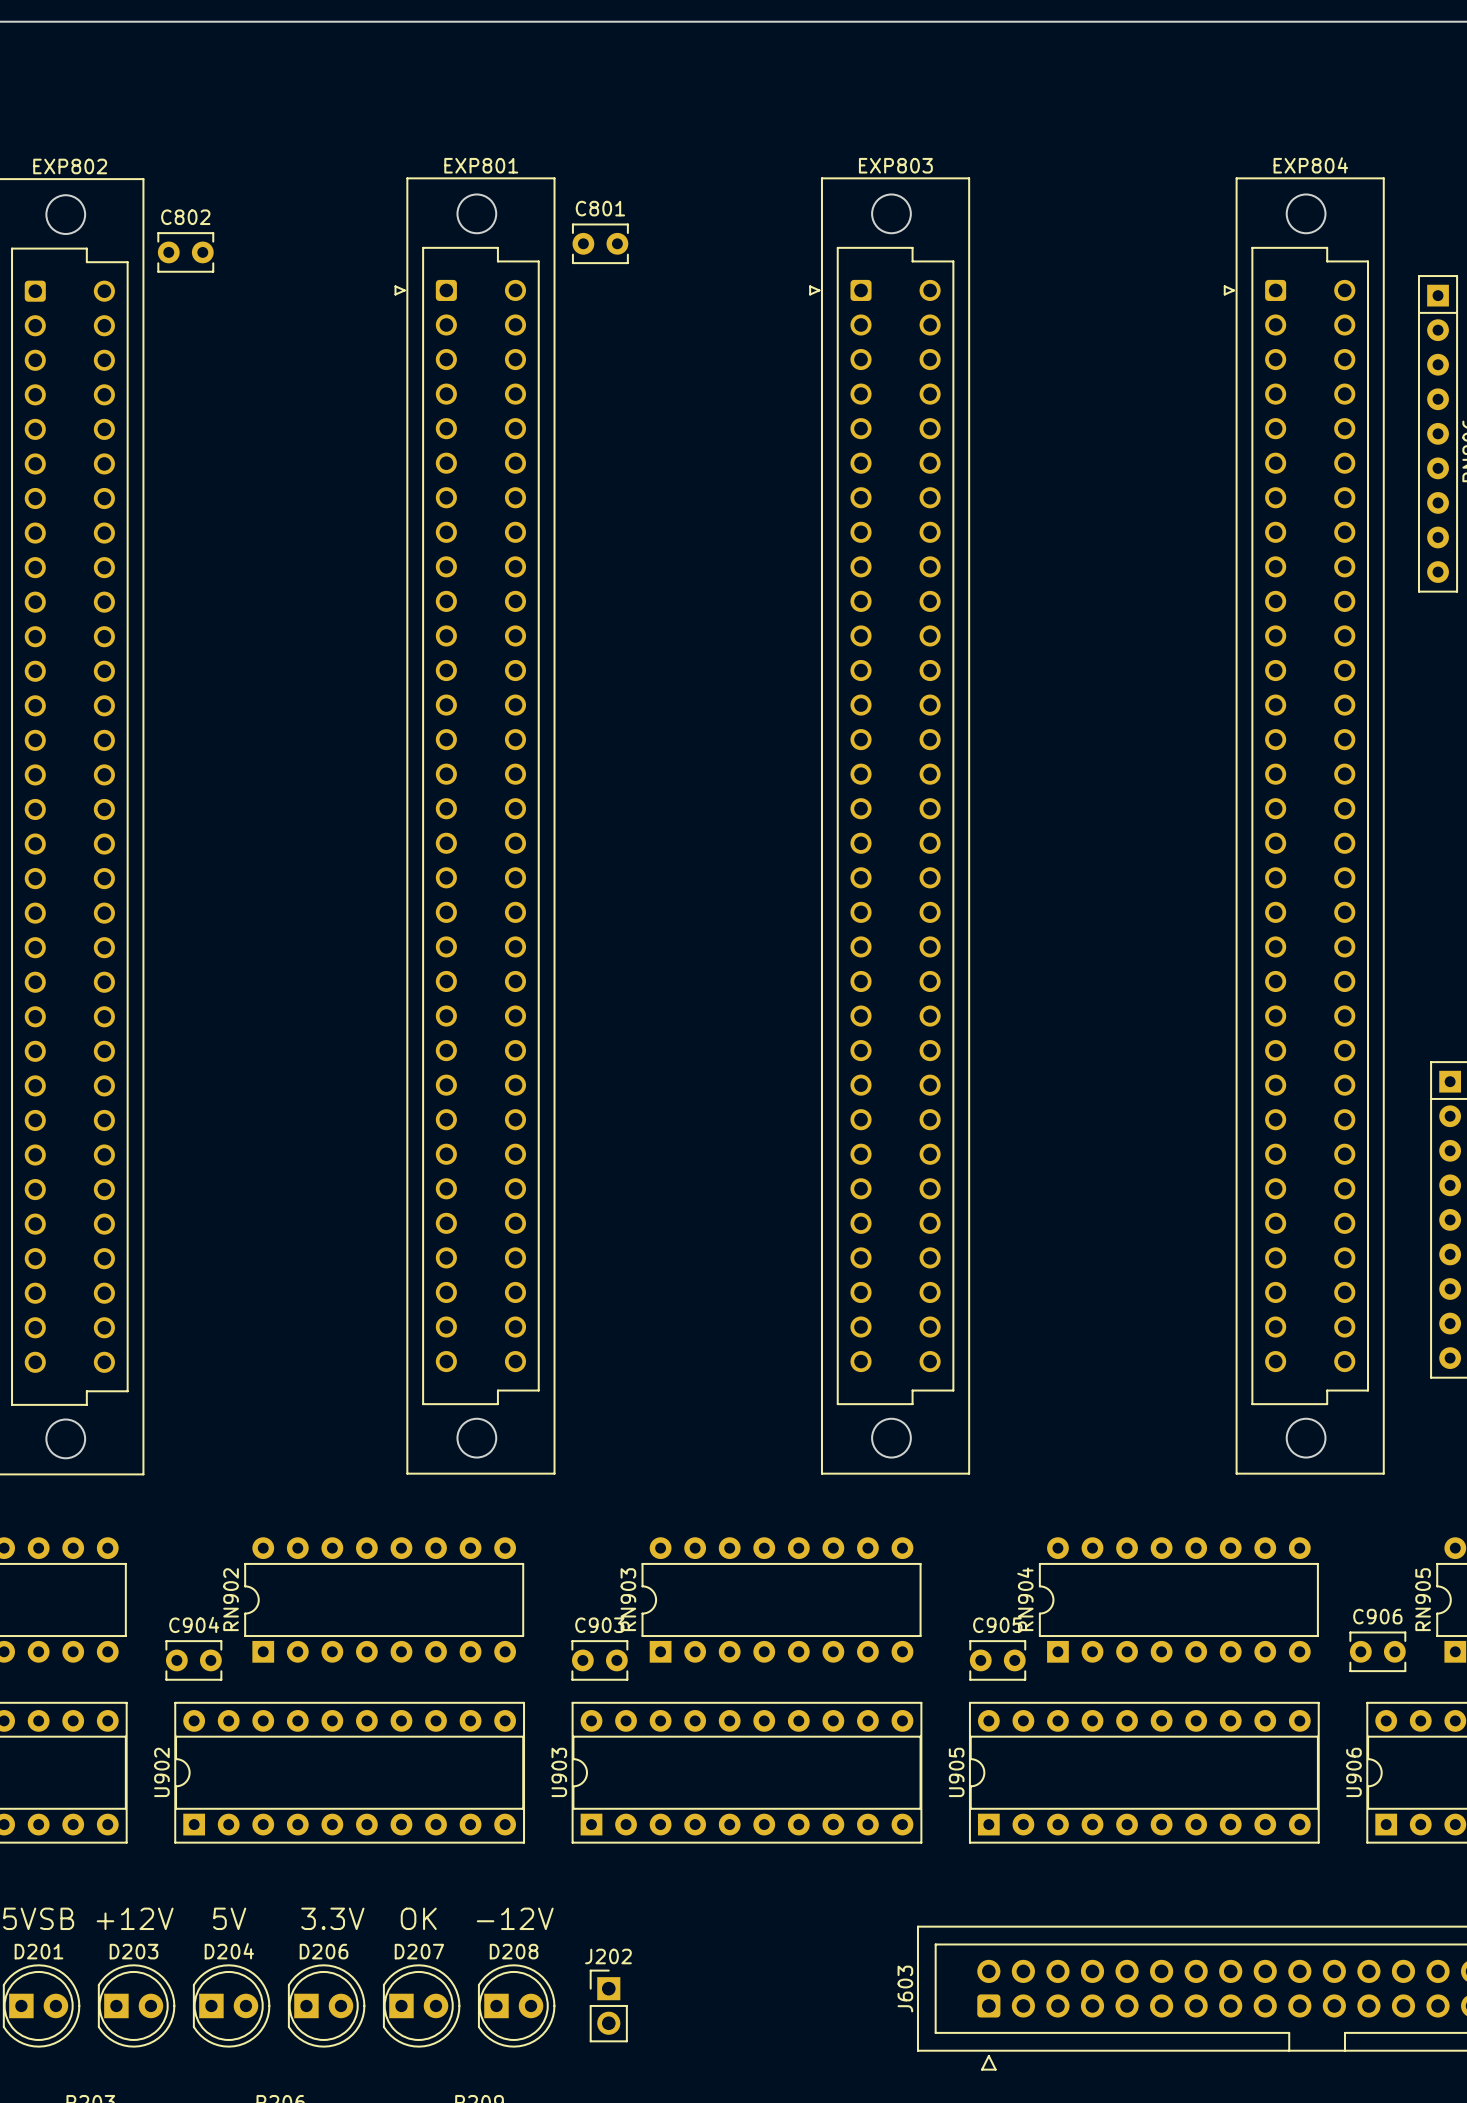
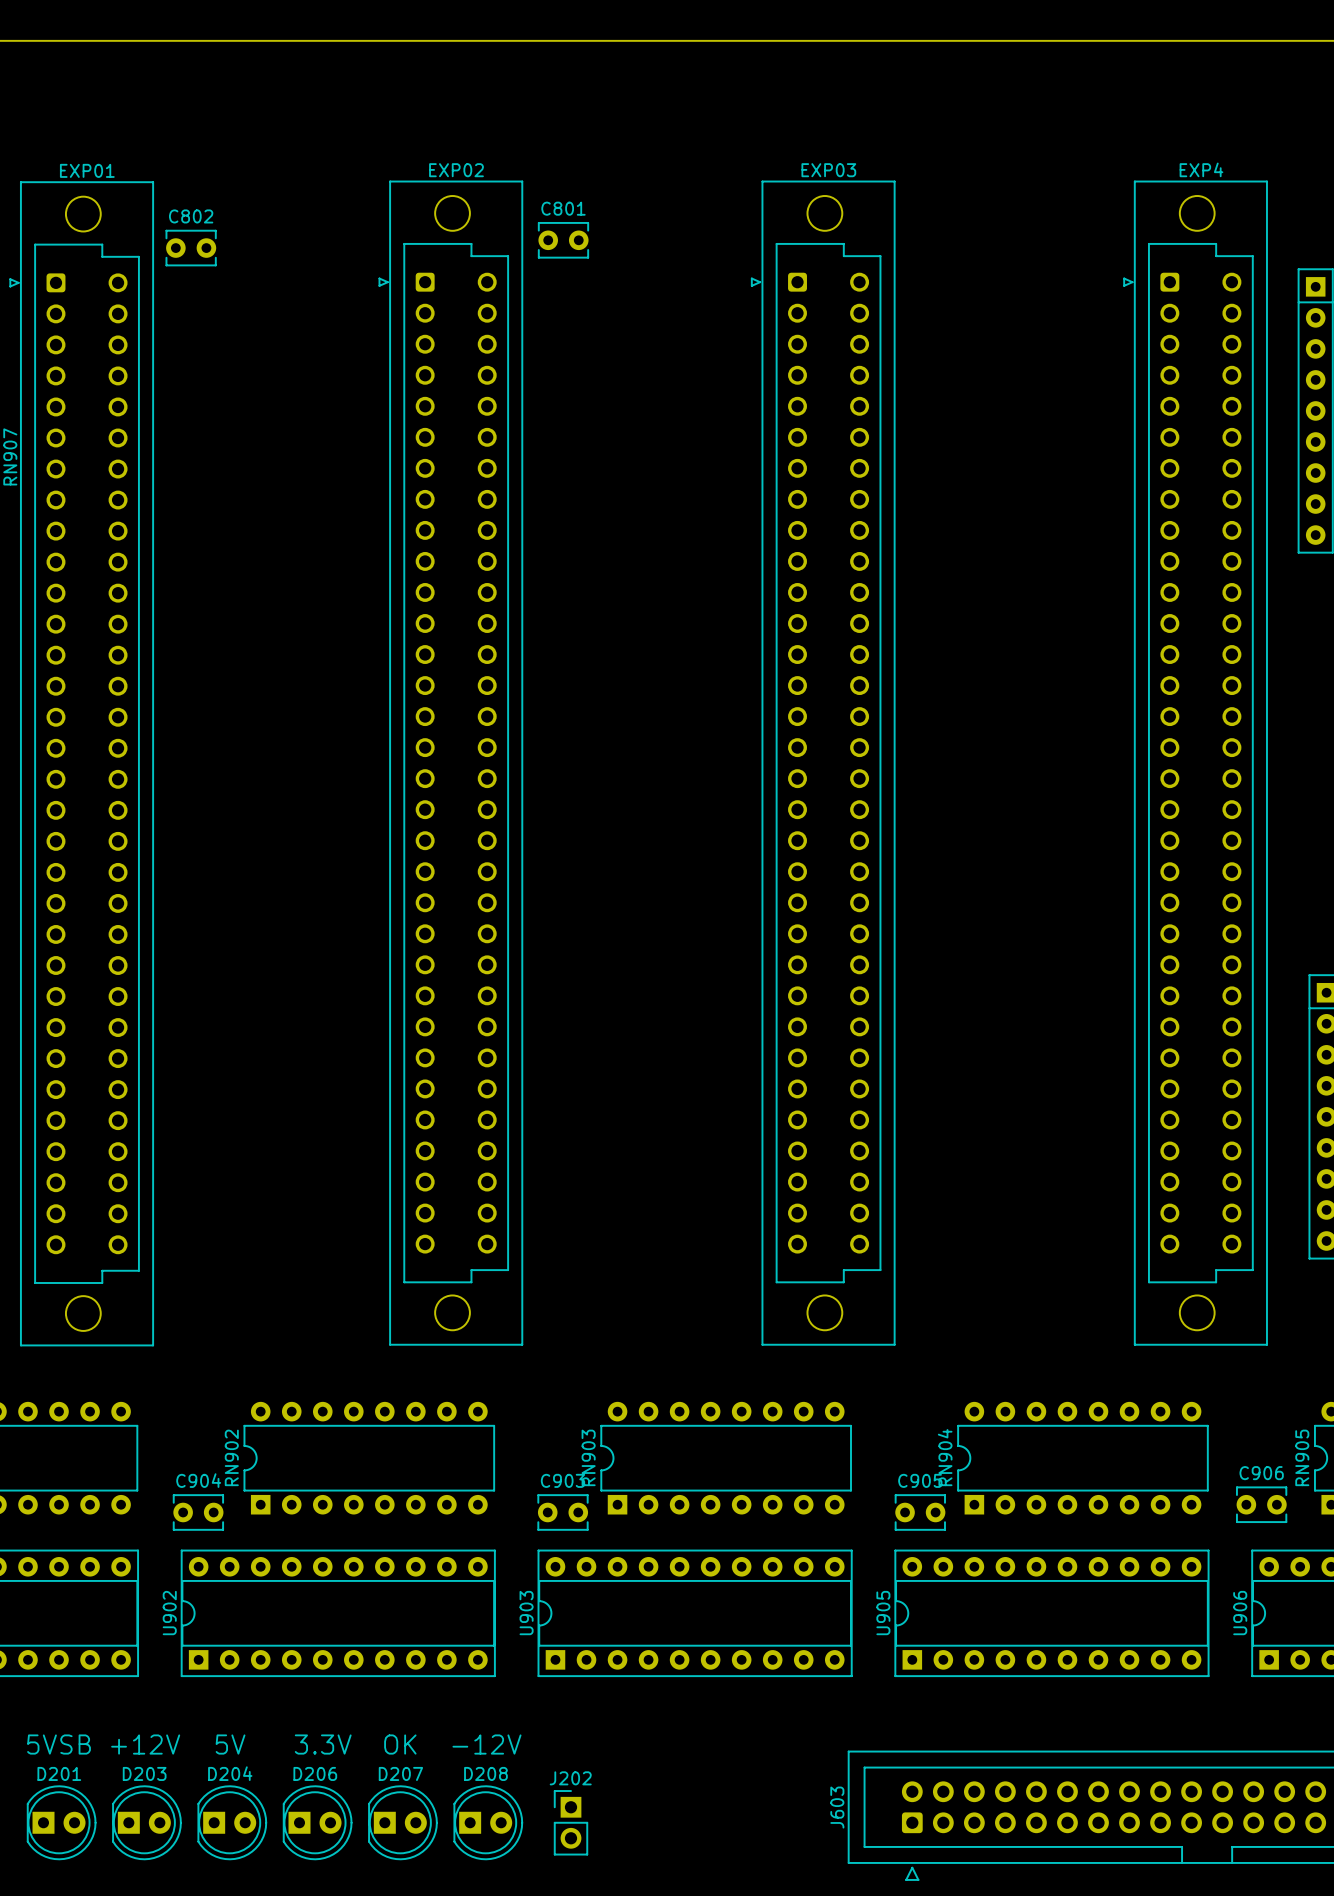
EXP801 name: EXP801 (481, 165) -> EXP02 (456, 170)
EXP803 name: EXP803 (895, 165) -> EXP03 (828, 170)
EXP804 name: EXP804 (1310, 165) -> EXP4 (1201, 169)
EXP802 name: EXP802 (70, 166) -> EXP01 (87, 170)

